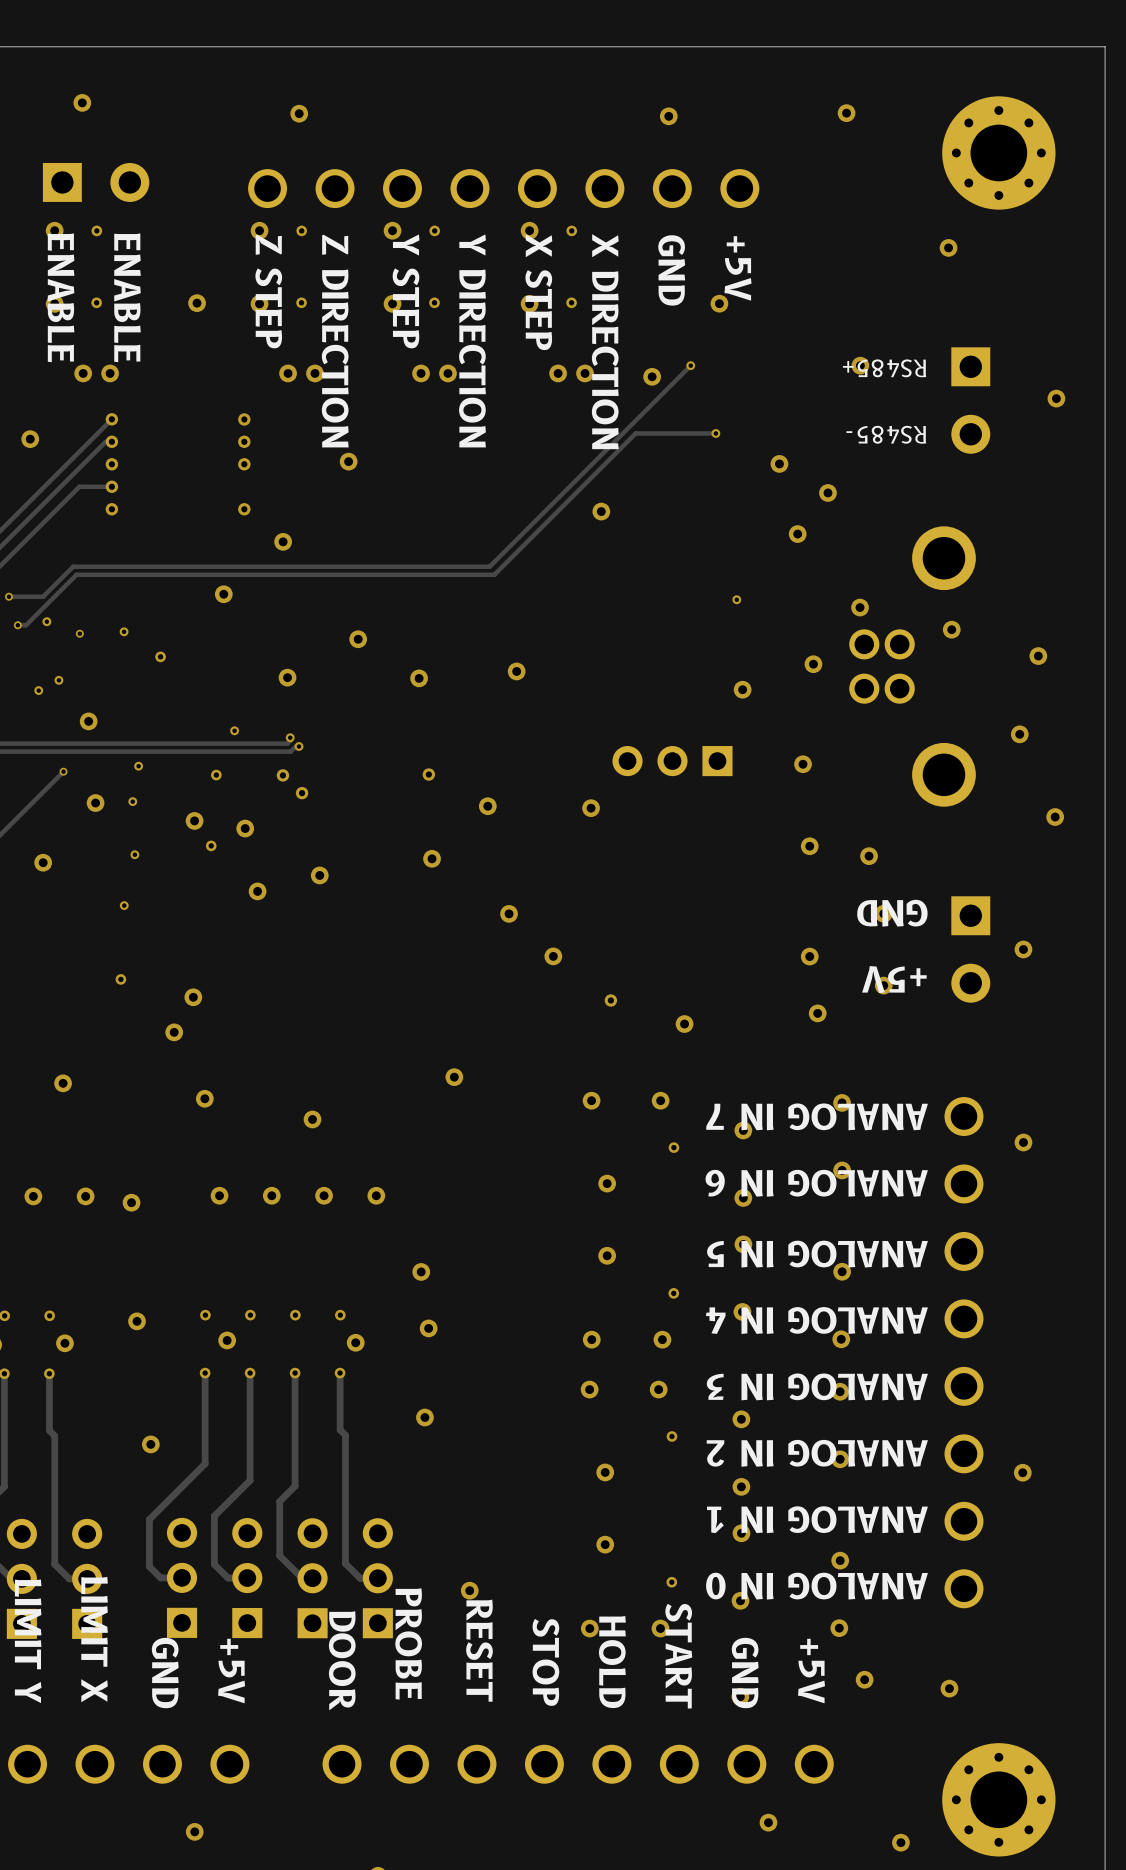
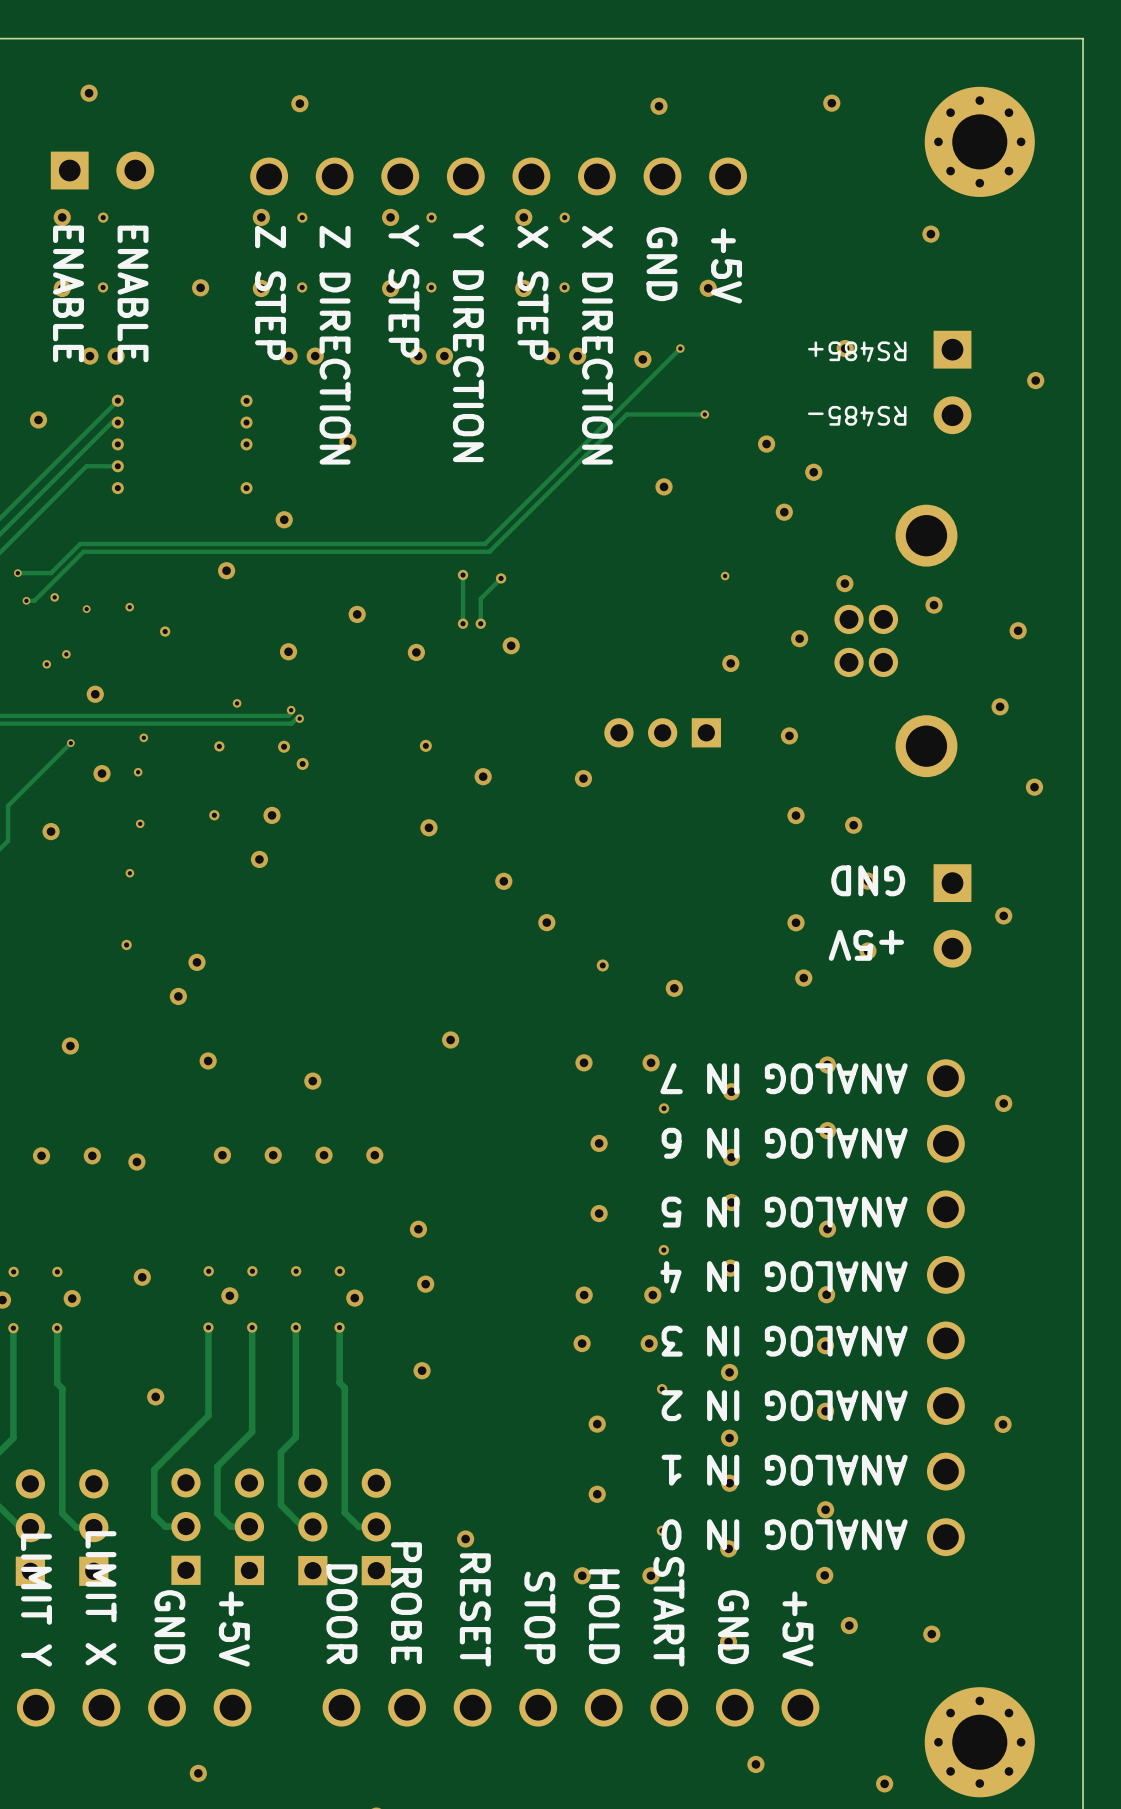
via position: (601, 511) -> (664, 486)
via: none -> (463, 575)
track: none -> (463, 575) (463, 623)
track: none -> (501, 578) (480, 598) (480, 623)
via: none -> (501, 578)
via: none -> (463, 623)
via: none -> (480, 623)
via: (194, 820) -> none
via: (245, 828) -> none
via: none -> (272, 815)
via: (319, 875) -> none

